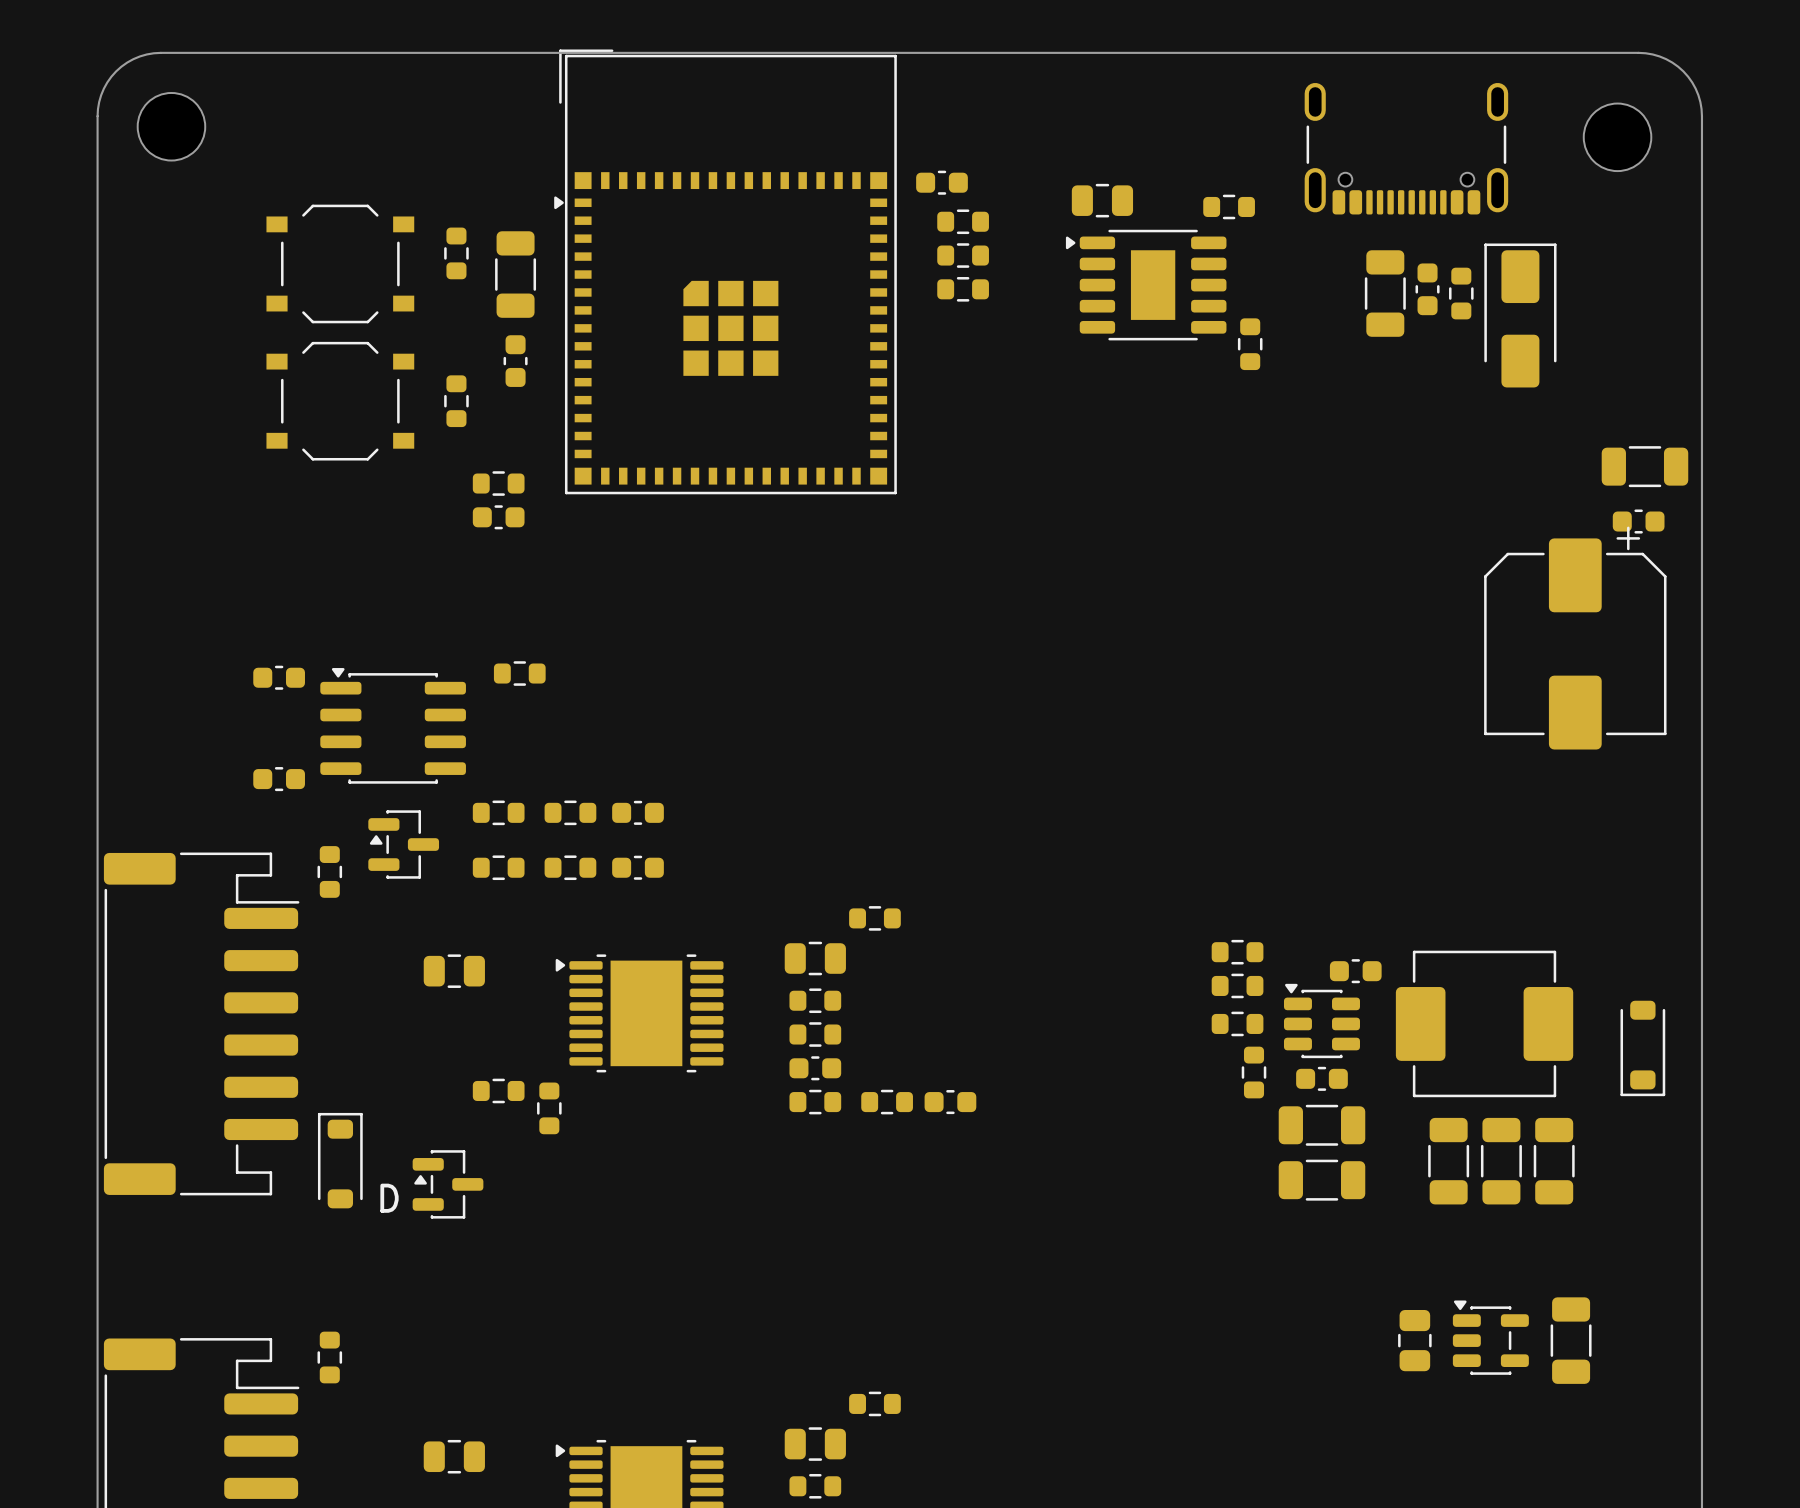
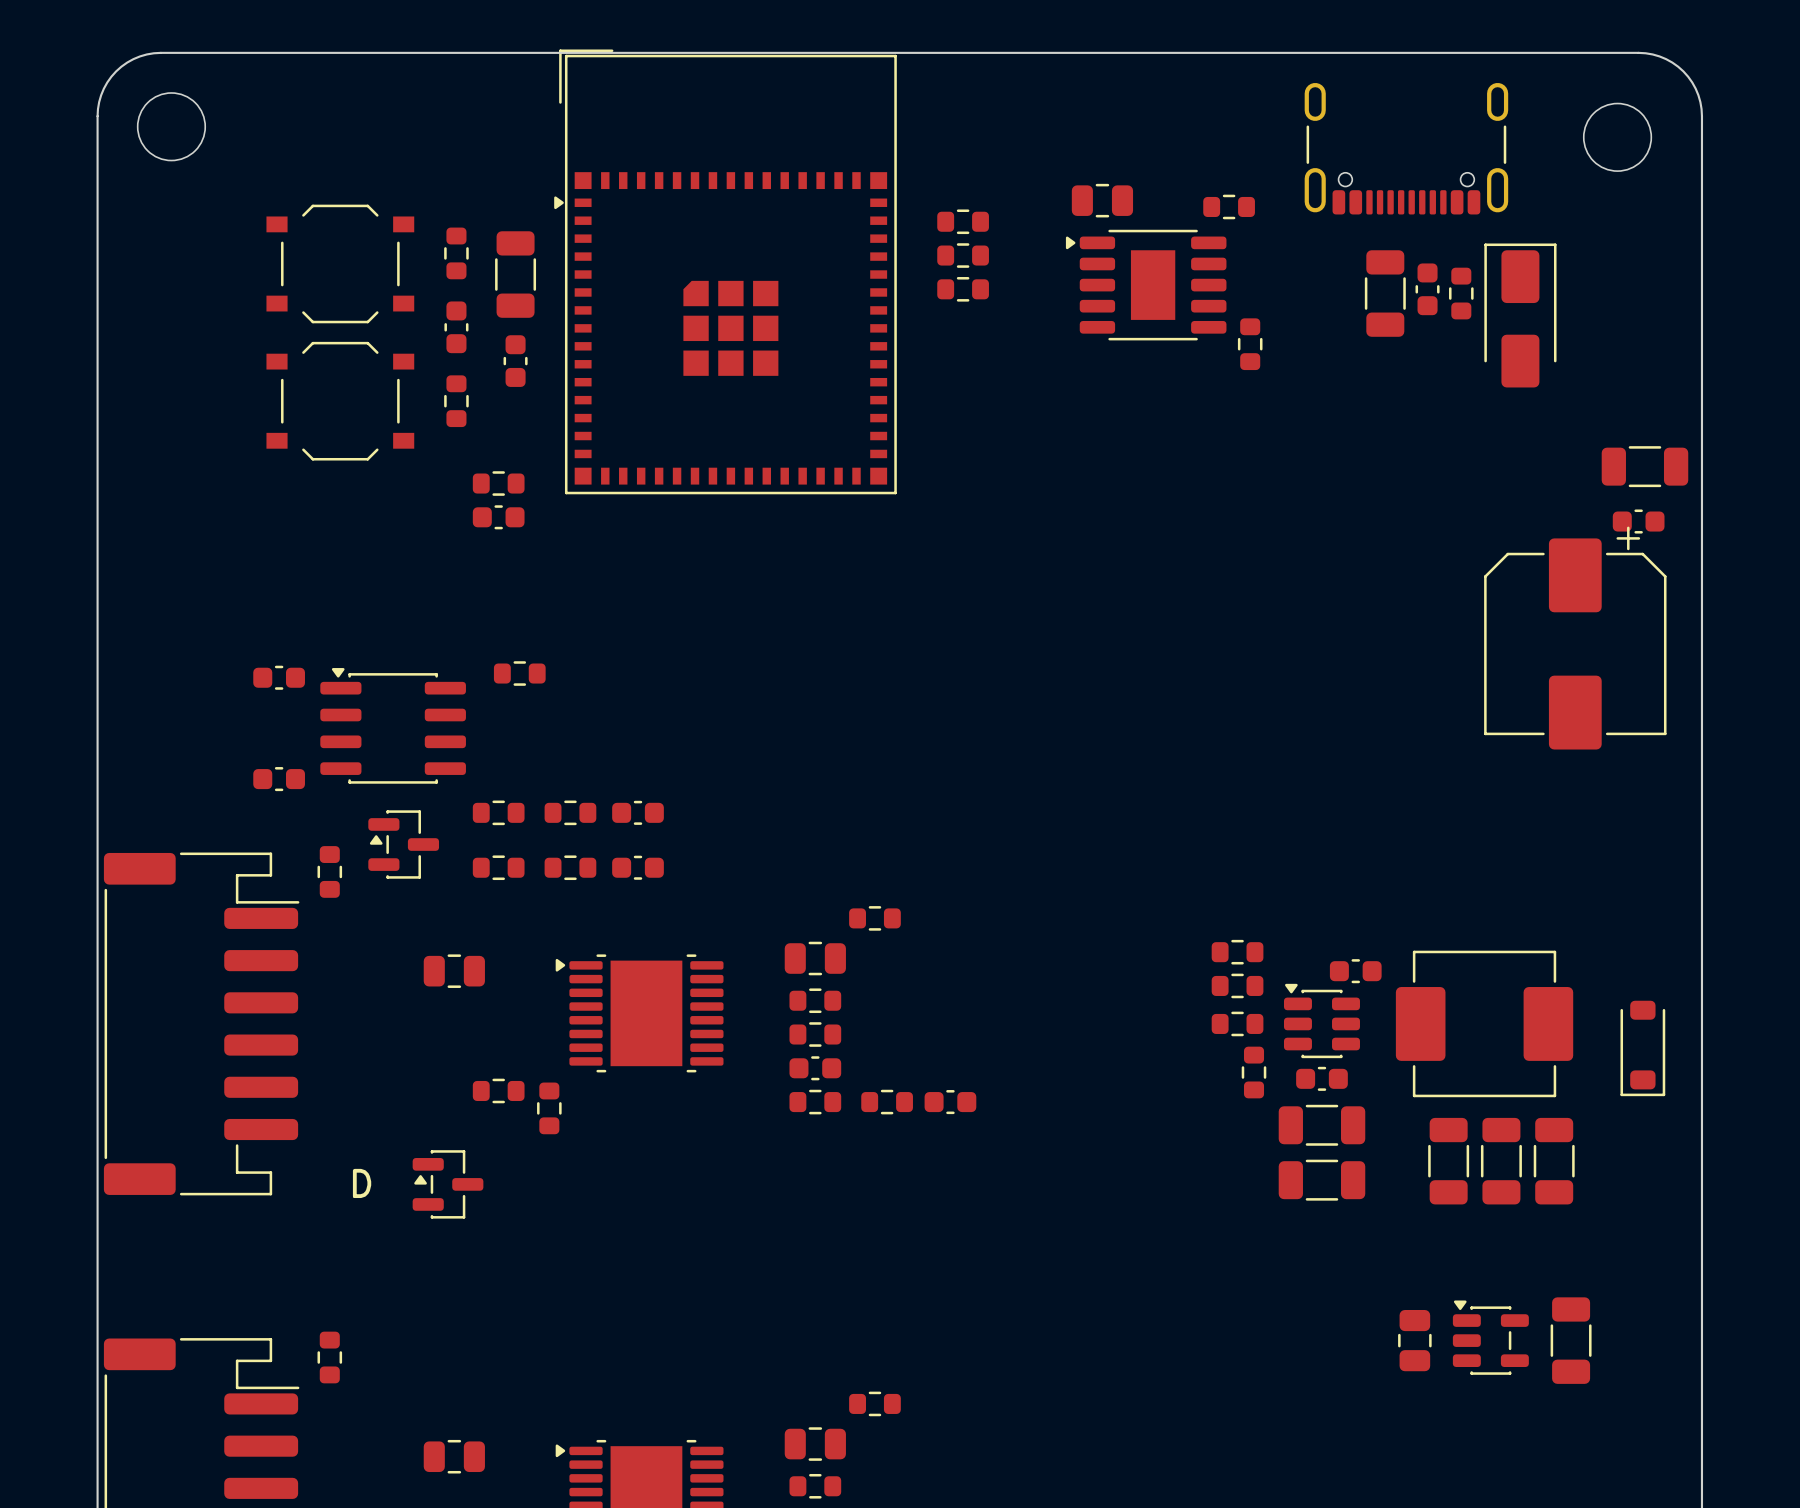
part rotation: 0° (941, 182) -> 90° clockwise (456, 327)
part position: (941, 182) -> (456, 327)
part: (340, 1160) -> none
text position: D (389, 1198) -> D (362, 1183)

